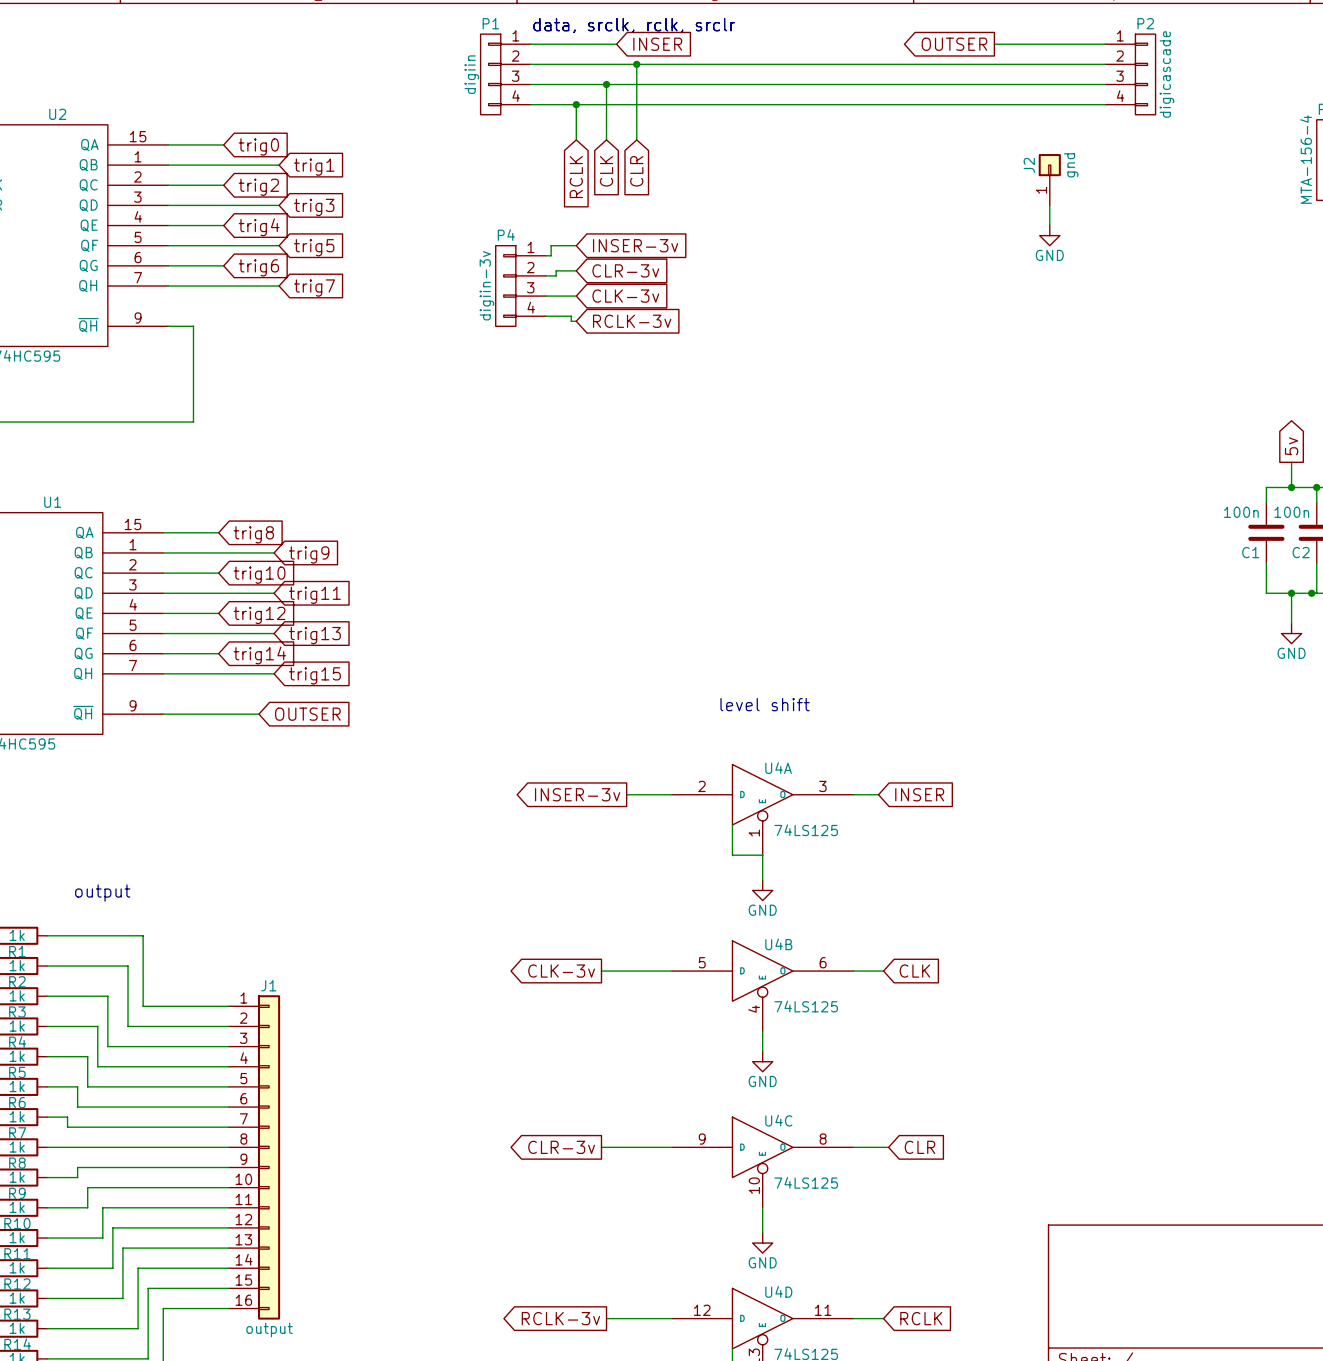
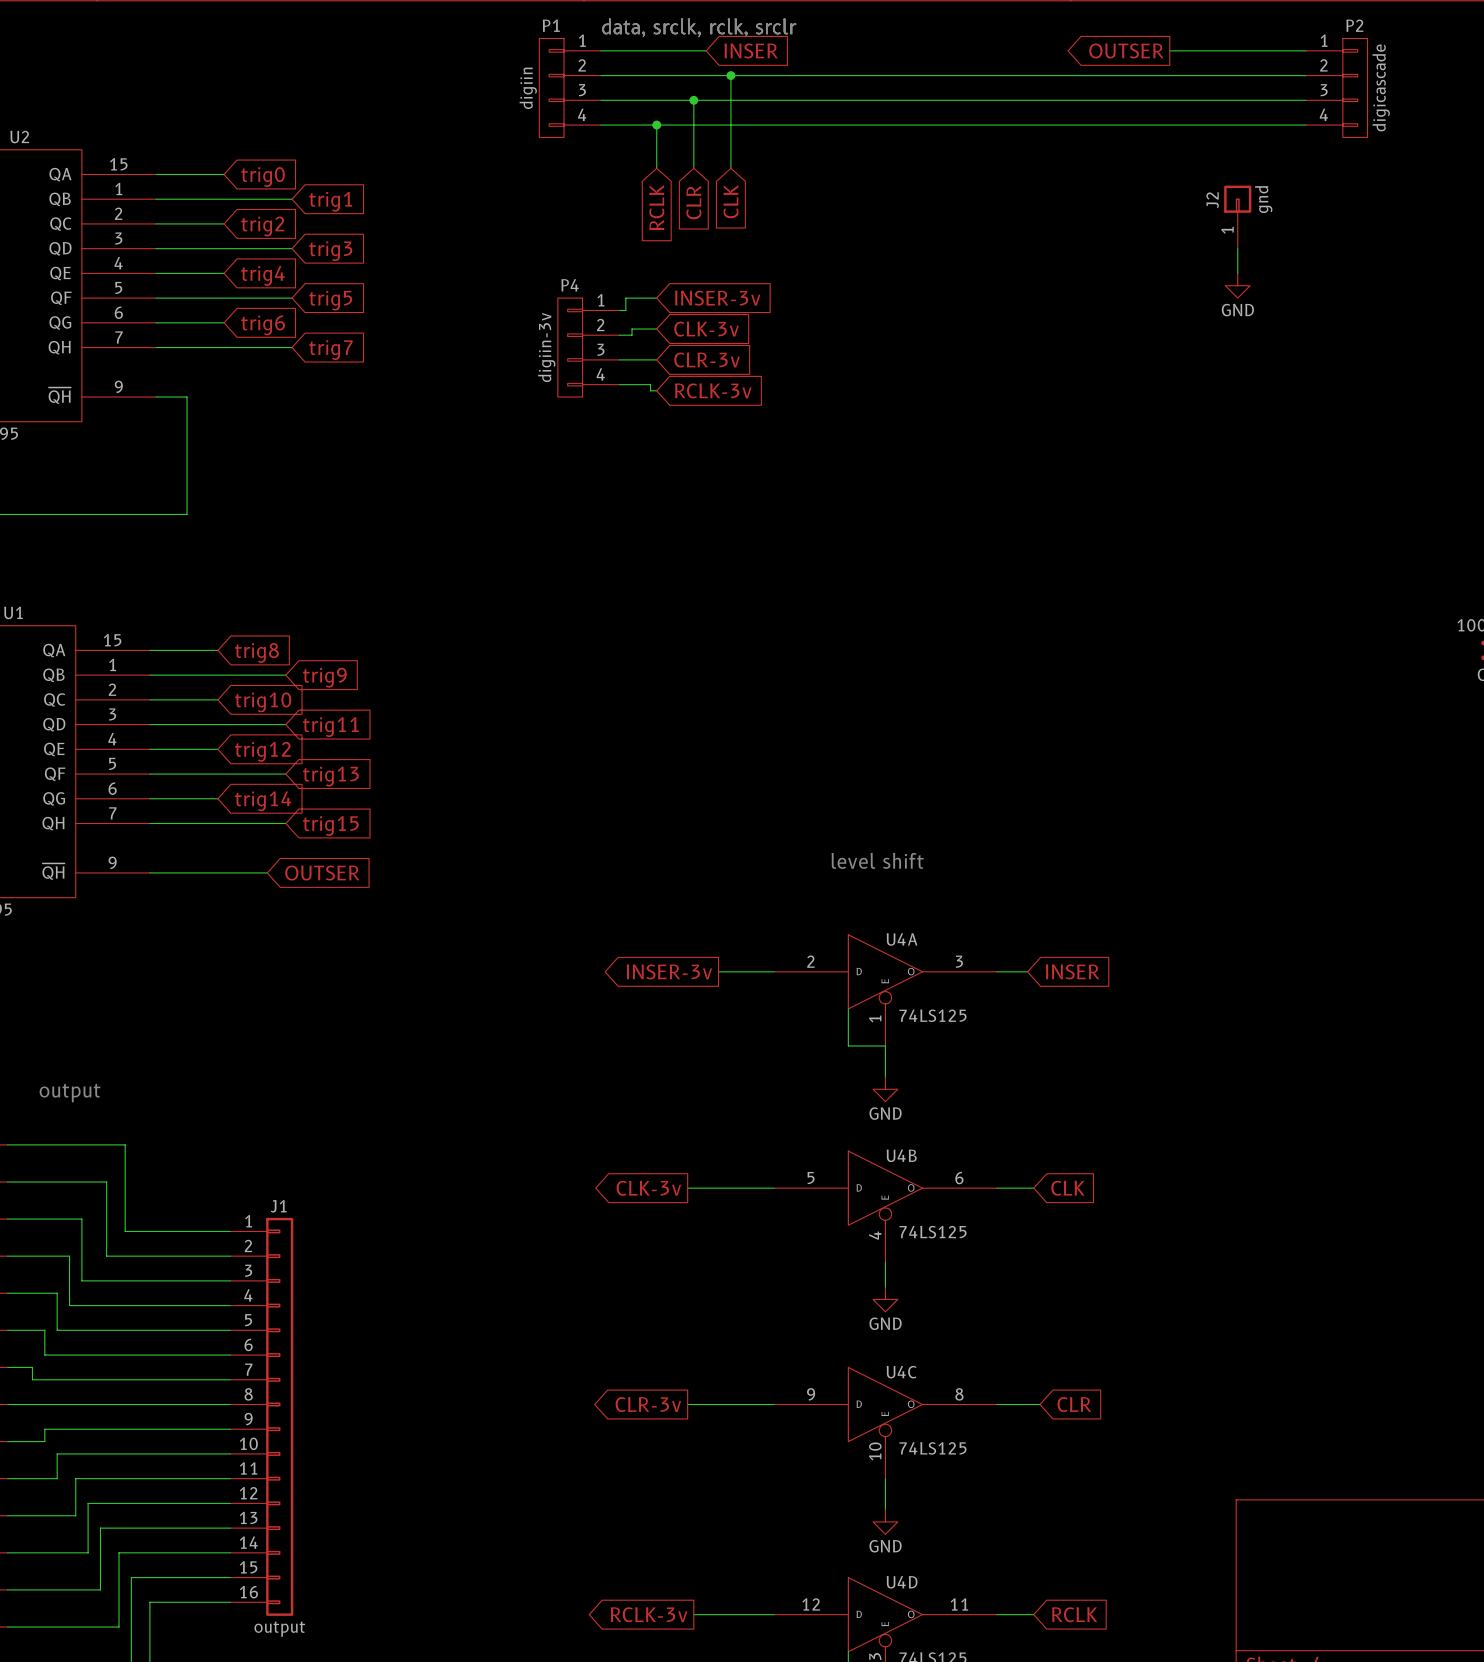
global label: CLK (606, 171) -> CLR (693, 202)
global label: CLR (636, 171) -> CLK (731, 201)
global label: CLR-3v (625, 270) -> CLK-3v (706, 329)
global label: CLK-3v (625, 296) -> CLR-3v (707, 360)

